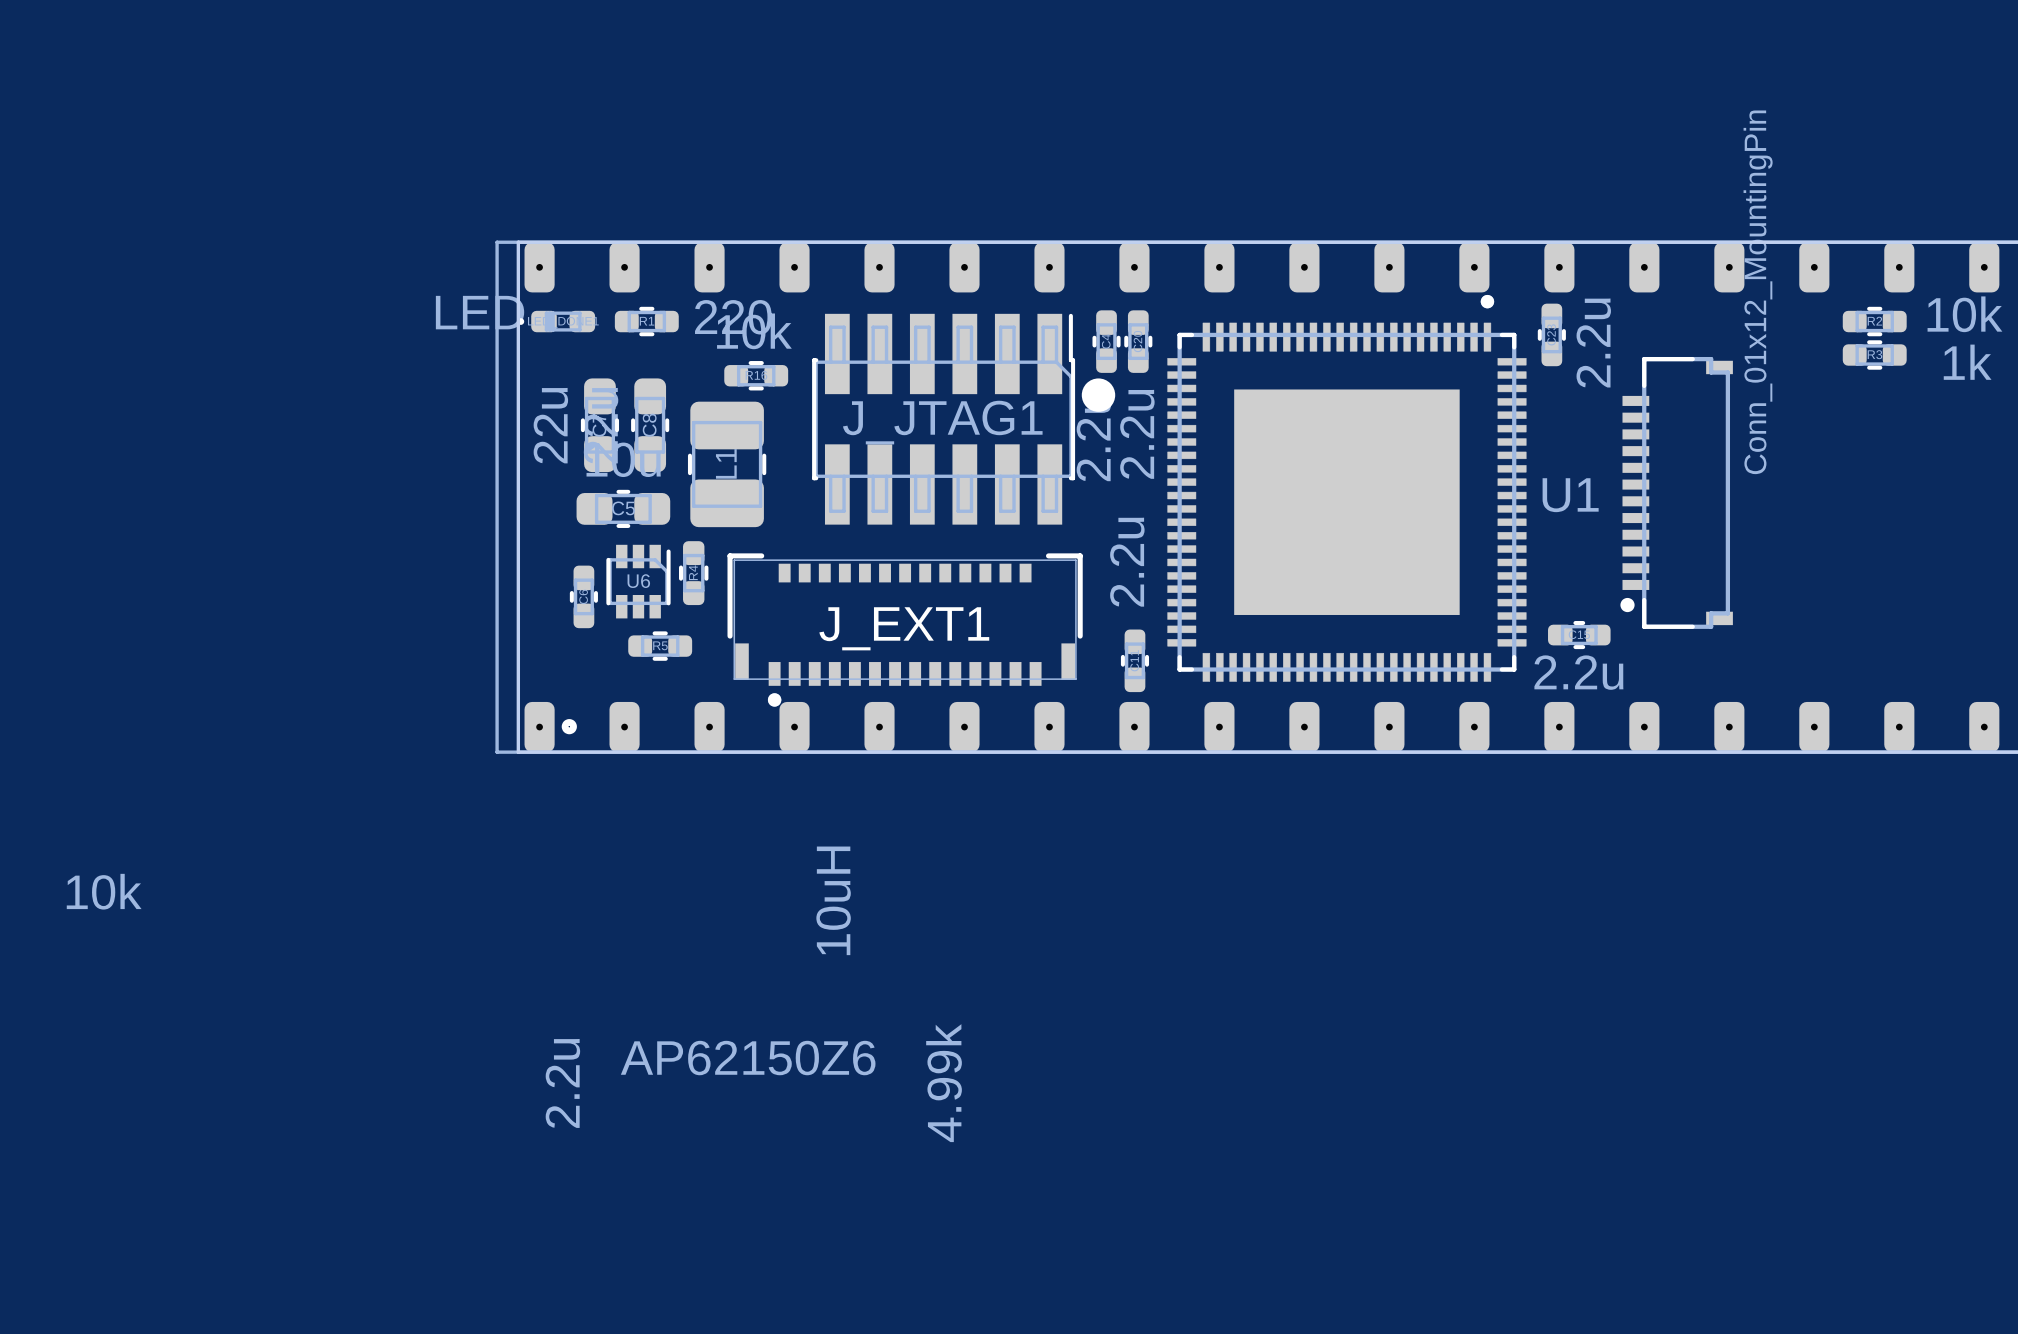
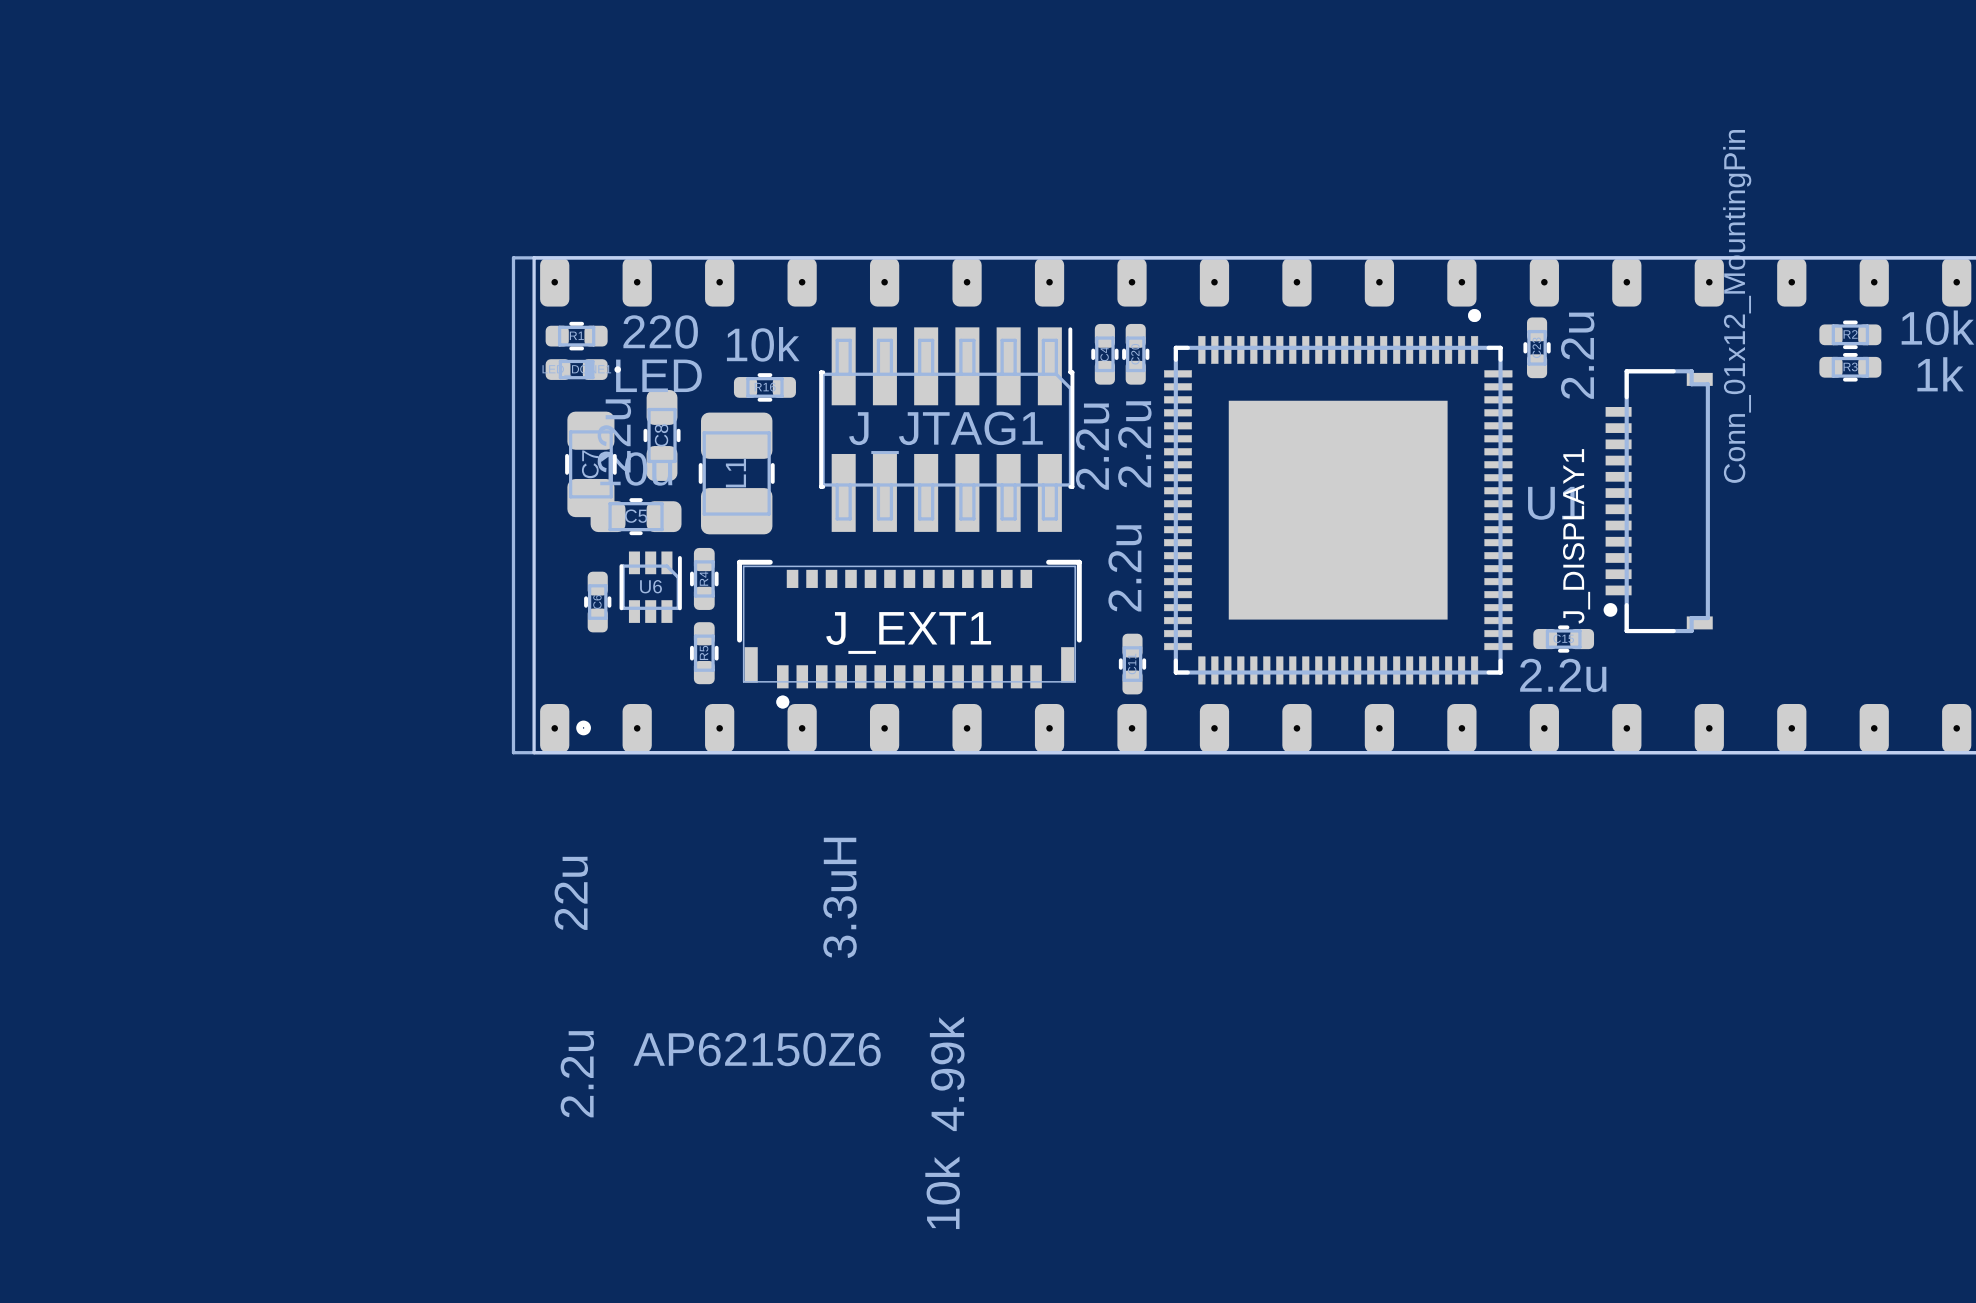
part rotation: 0° (556, 321) -> 180° (583, 369)
R1 position: (646, 321) -> (576, 336)
C7 footprint: [580, 378, 620, 473] -> [565, 411, 617, 518]
drawing: [1081, 378, 1116, 412] -> none
C7 value position: 22u (550, 425) -> 22u (571, 893)
J_DISPLAY1 name: none -> J_DISPLAY1 (1576, 536)
R5 rotation: 0° (660, 646) -> 90° clockwise (704, 653)
R5 value position: 10k (104, 891) -> 10k (942, 1192)
L1 value: 10uH (833, 900) -> 3.3uH (840, 897)

